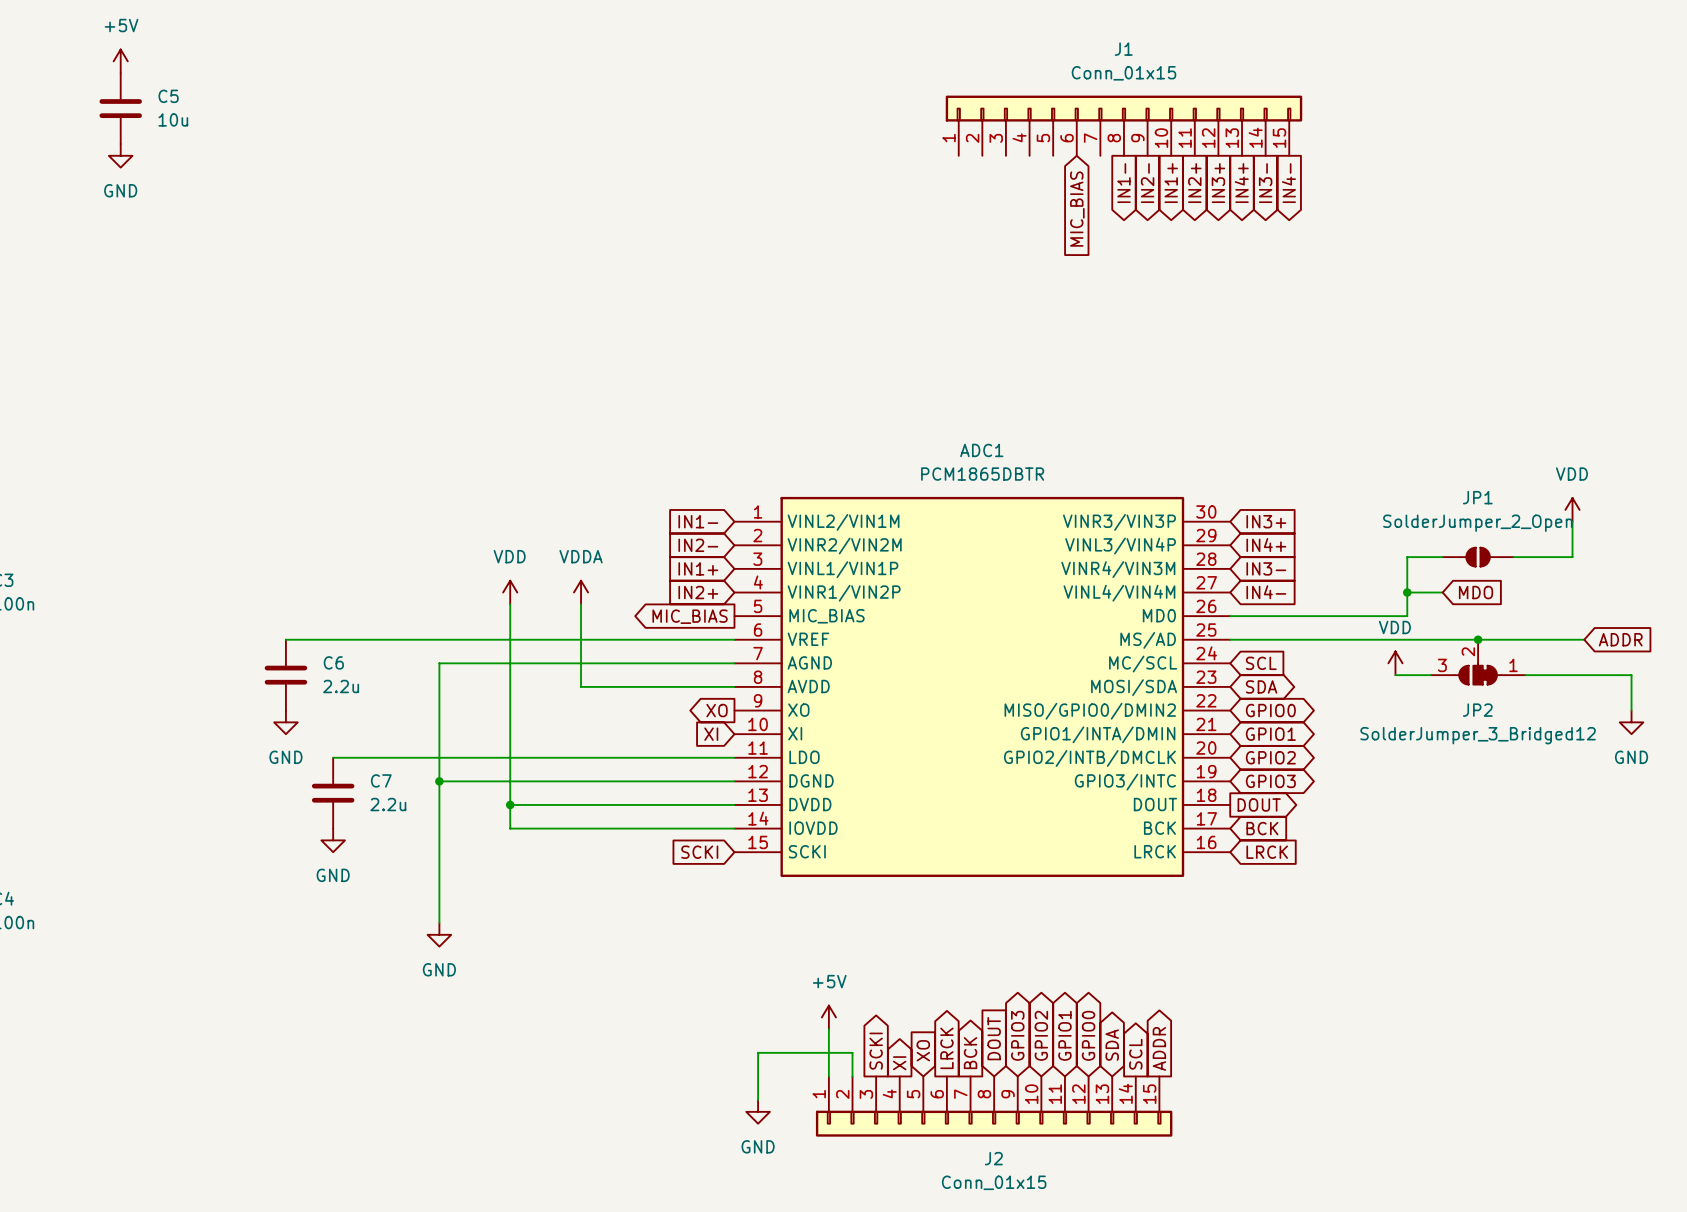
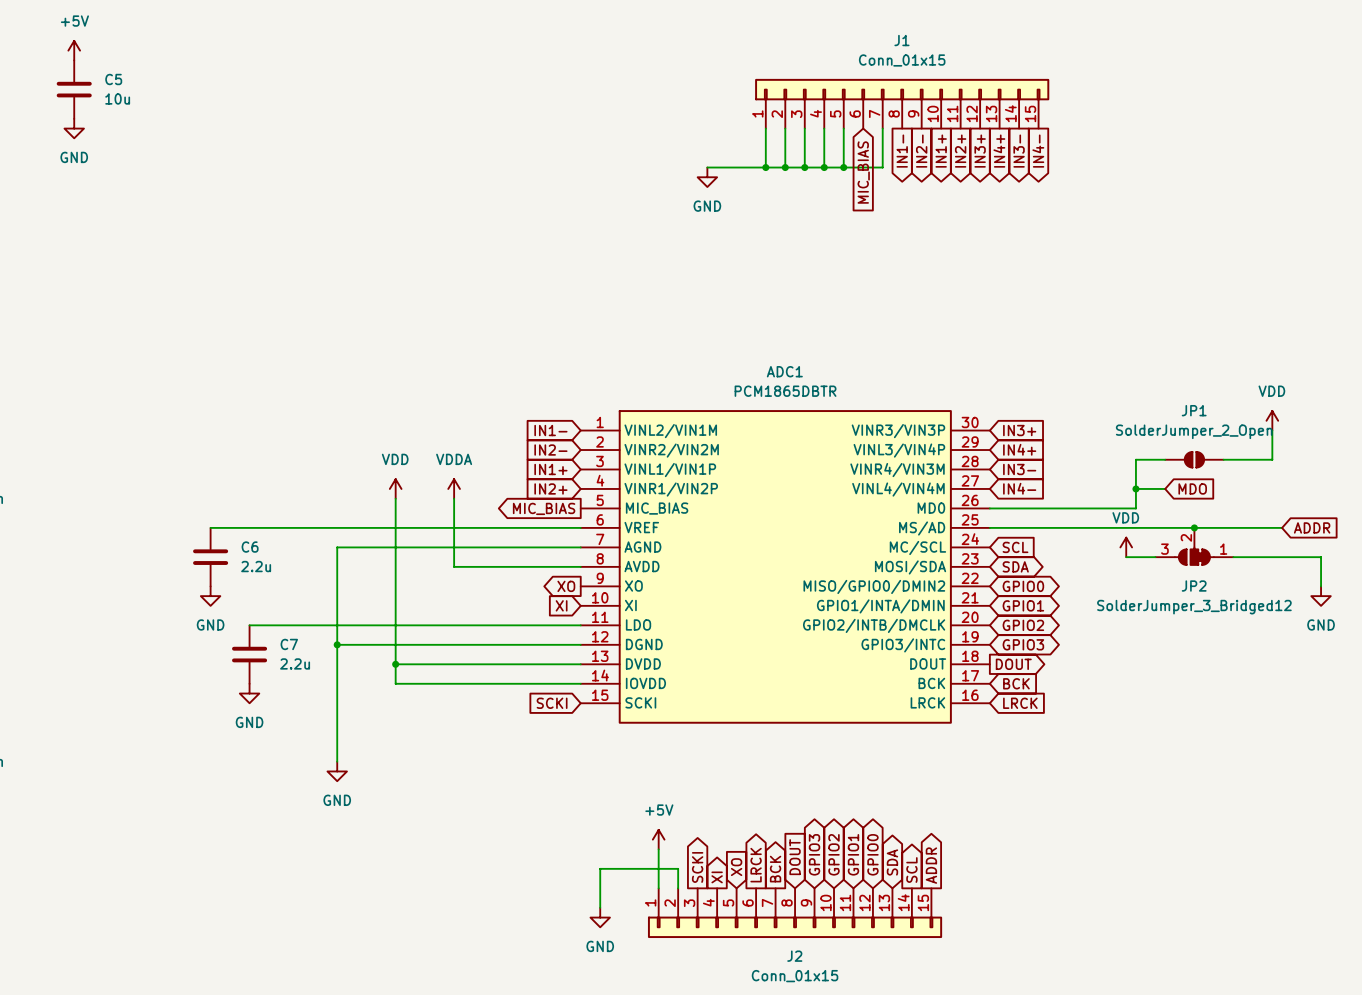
wire: none -> (765, 128) (765, 167)
wire: none -> (785, 128) (785, 167)
wire: none -> (804, 128) (804, 167)
wire: none -> (824, 128) (824, 167)
wire: none -> (843, 128) (843, 167)
wire: none -> (882, 128) (882, 167) (707, 167)
junction: none -> (765, 167)
junction: none -> (785, 167)
junction: none -> (804, 167)
junction: none -> (824, 167)
junction: none -> (843, 167)
power symbol: none -> GND (707, 177)

